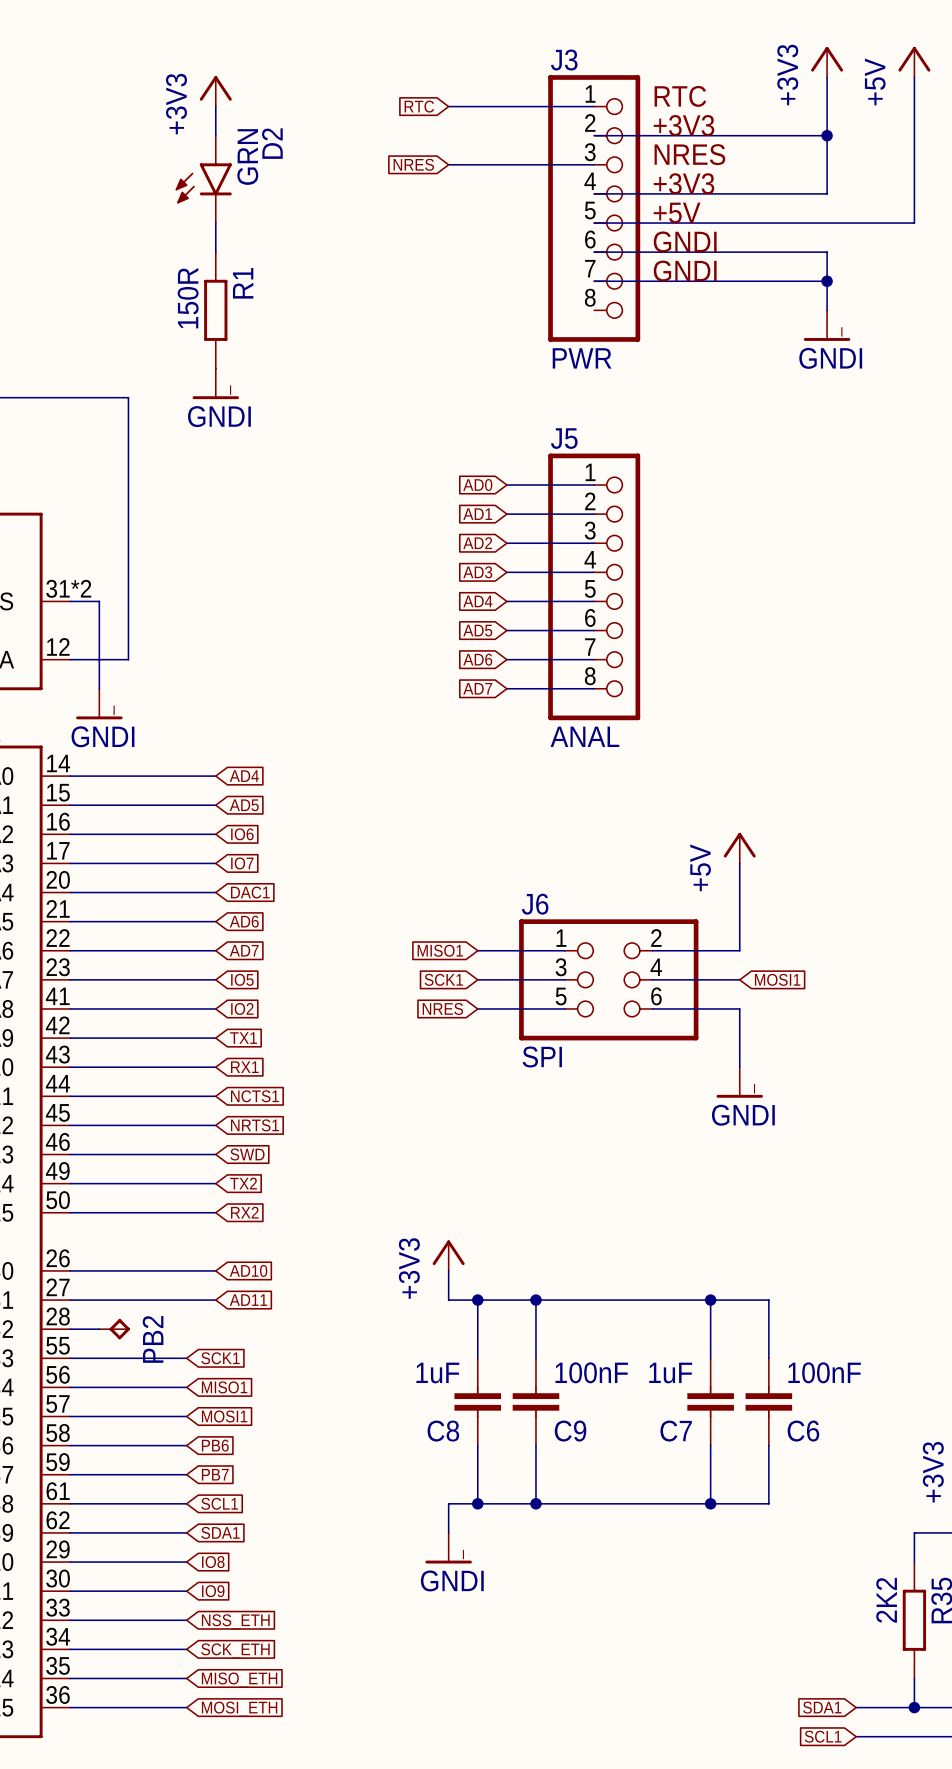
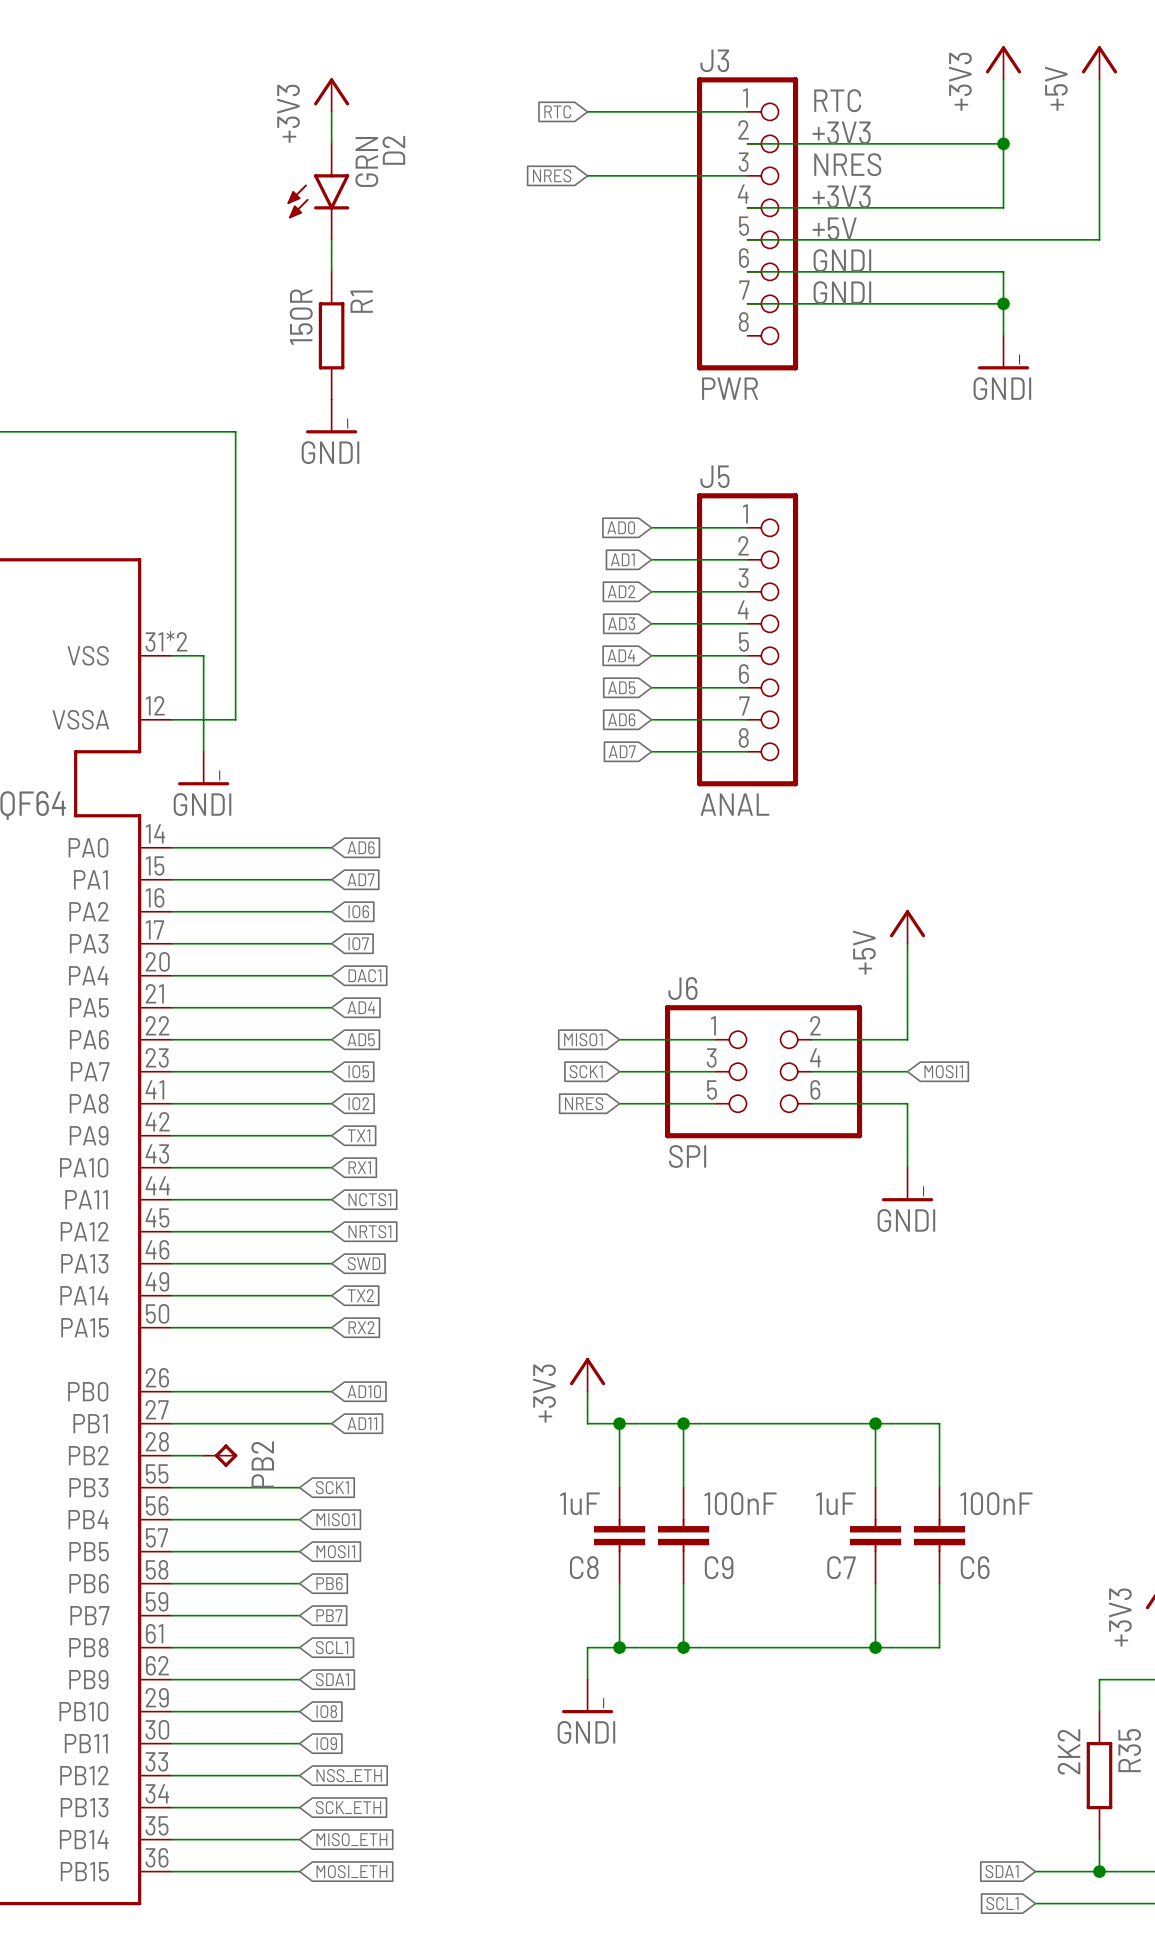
global label: AD4 (244, 776) -> AD6 (361, 847)
global label: AD5 (244, 805) -> AD7 (361, 879)
global label: AD6 (244, 921) -> AD4 (361, 1007)
global label: AD7 (244, 950) -> AD5 (361, 1039)

